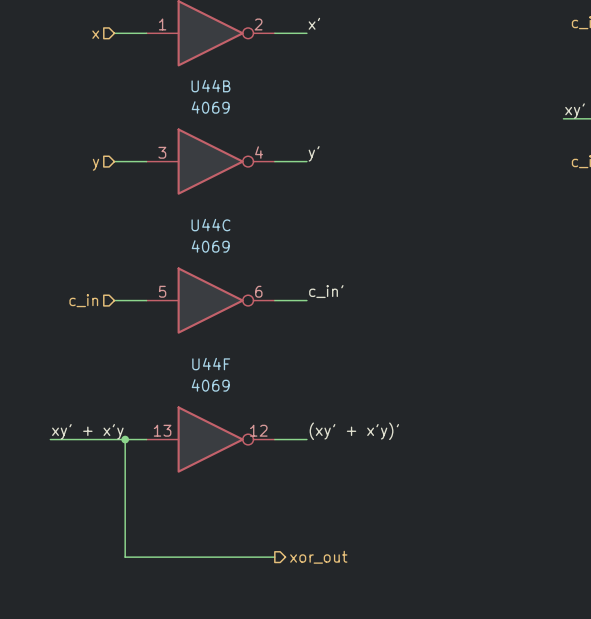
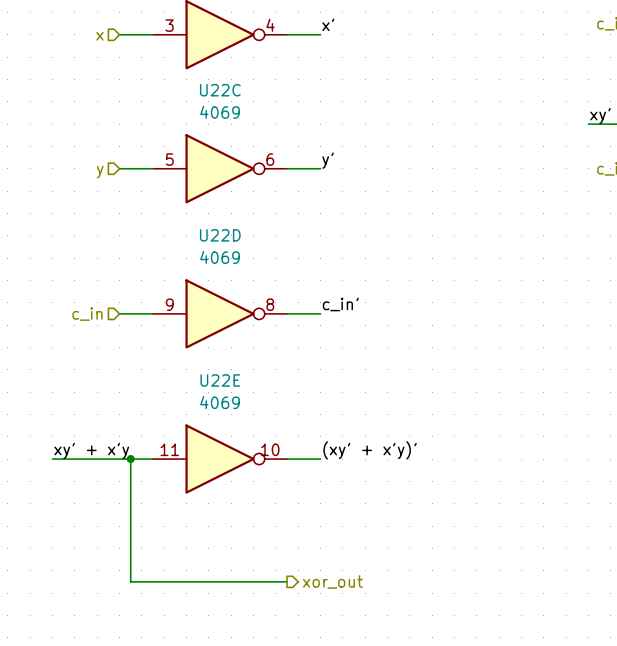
part pin number: 1 (162, 24) -> 3 (169, 25)
part pin number: 2 (258, 24) -> 4 (270, 25)
U44B name: U44B (210, 86) -> U22C (220, 90)
U44B pin number: 3 (162, 152) -> 5 (169, 159)
U44B pin number: 4 (259, 152) -> 6 (270, 159)
U44C name: U44C (210, 225) -> U22D (220, 235)
U44C pin number: 5 (162, 291) -> 9 (169, 304)
U44C pin number: 6 (258, 291) -> 8 (270, 304)
U44F name: U44F (211, 364) -> U22E (220, 380)
U44F pin number: 13 (162, 430) -> 11 (169, 449)
U44F pin number: 12 (258, 430) -> 10 (270, 449)

